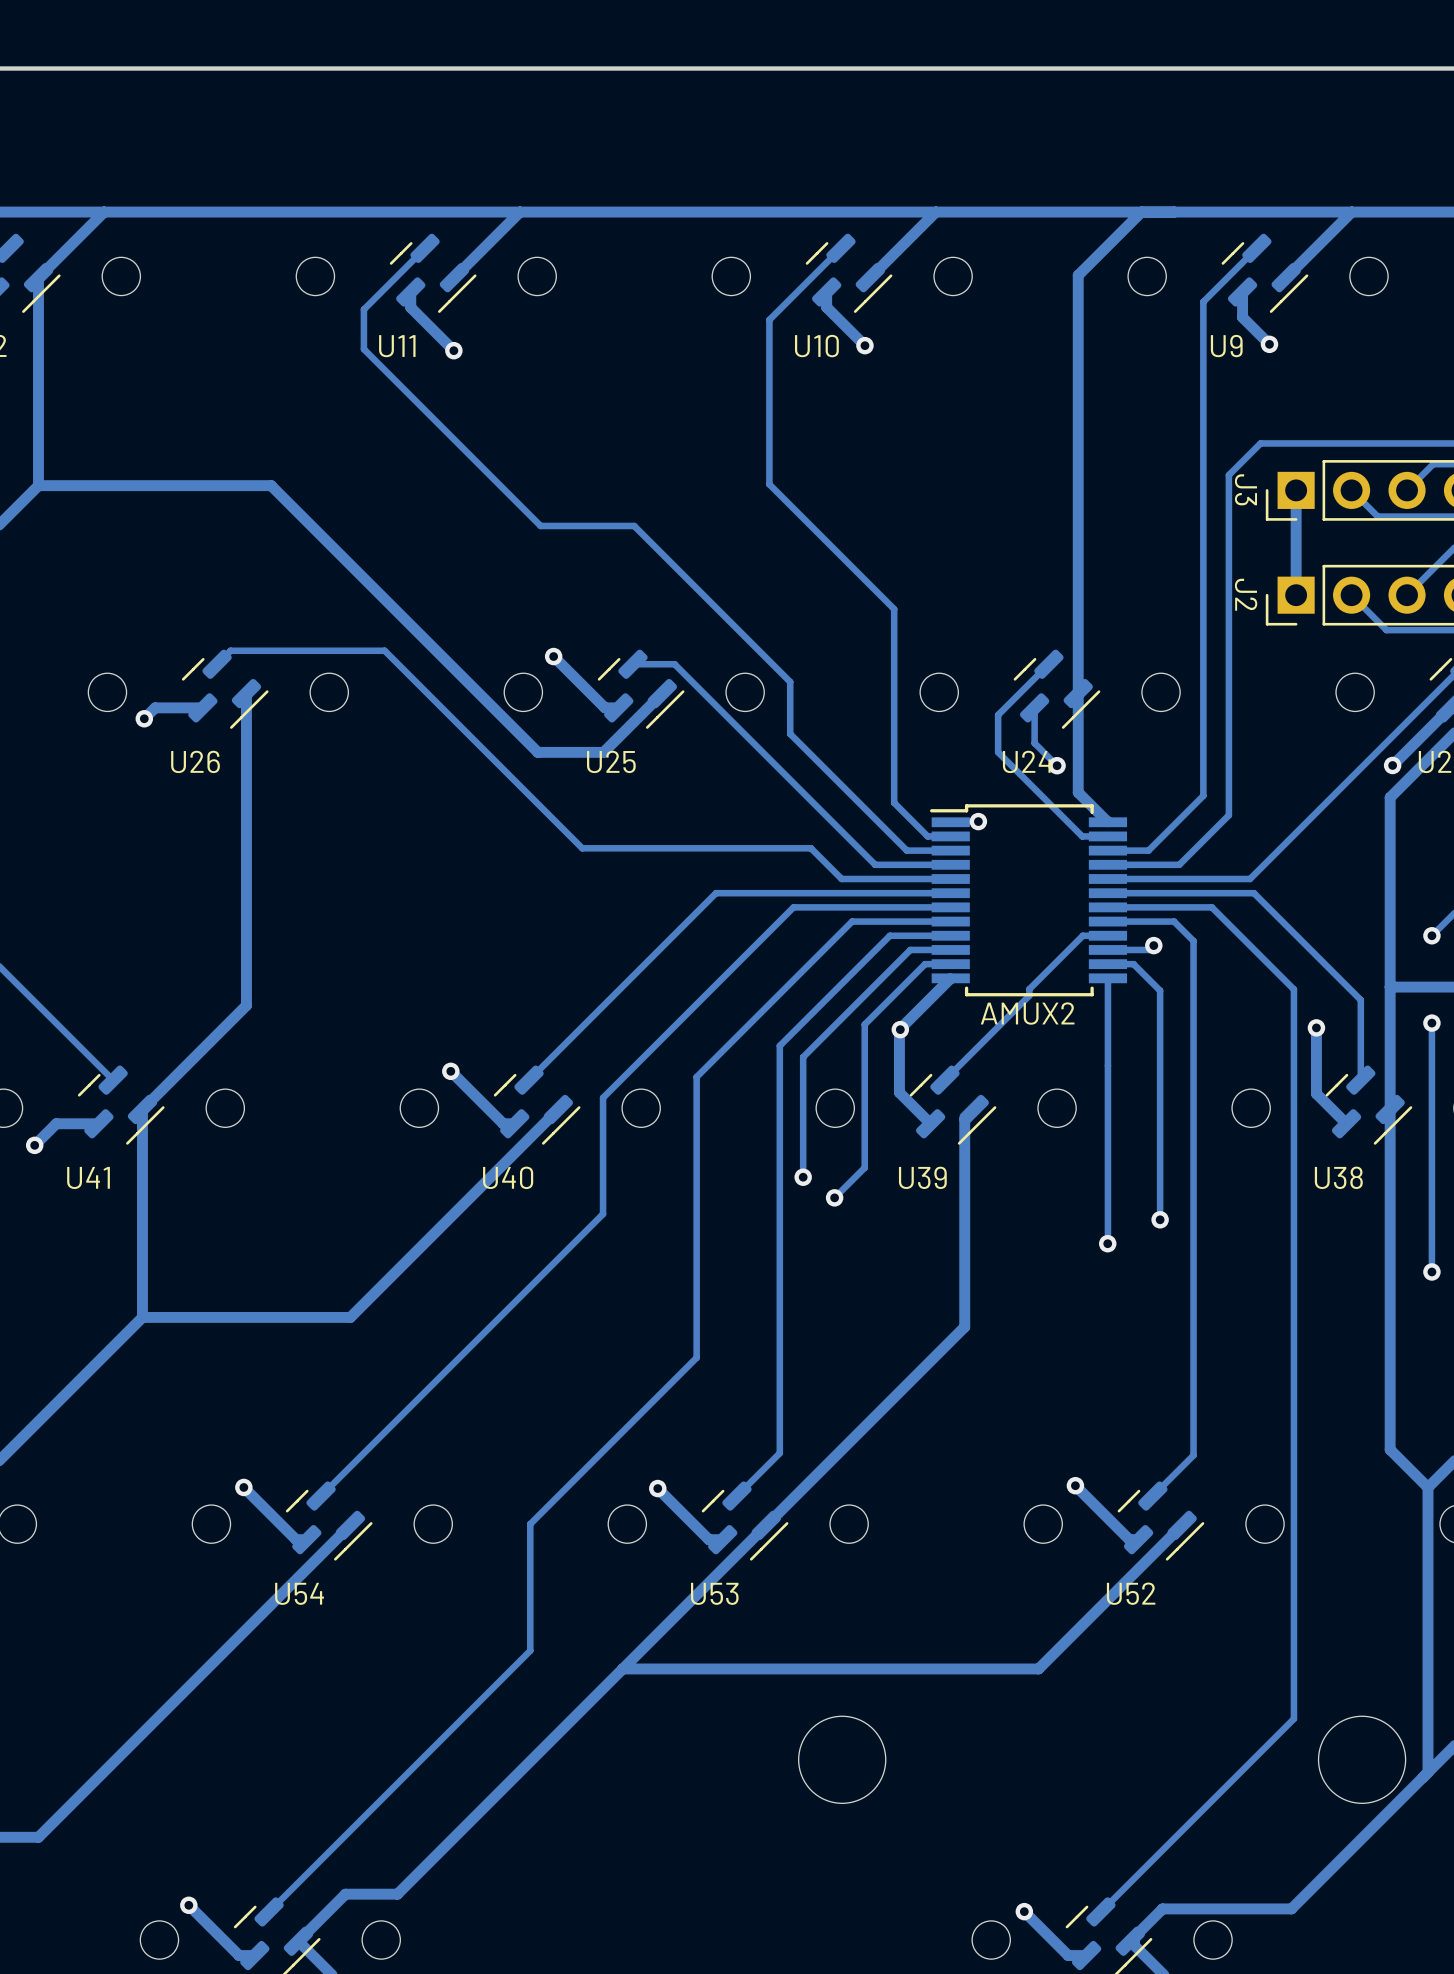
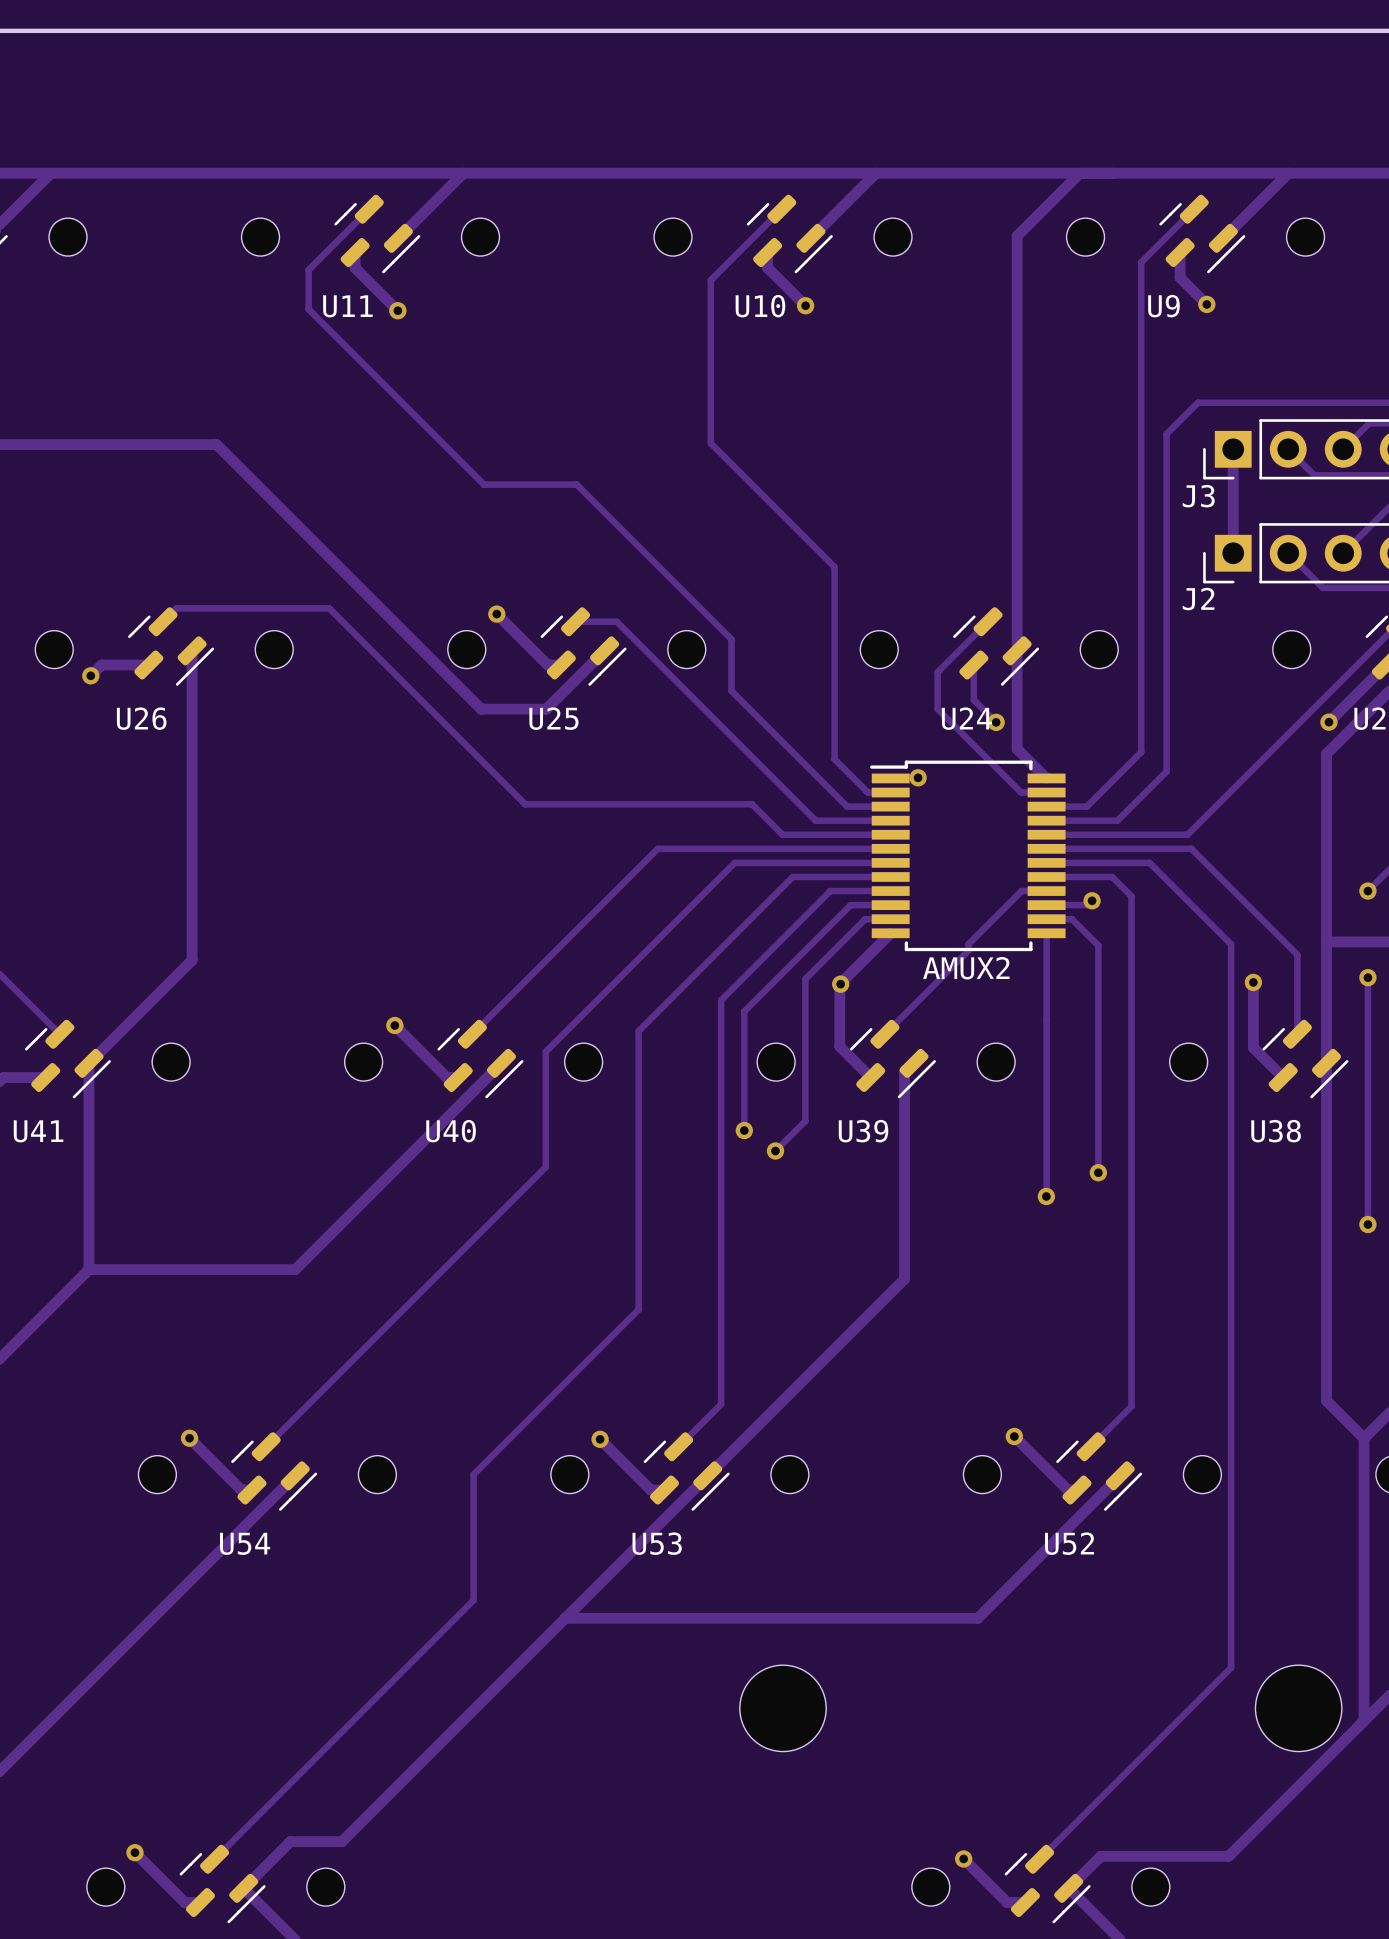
J3 name rotation: 0° (1245, 489) -> 90° counterclockwise (1198, 496)
J3 name position: J3 (1245, 489) -> J3 (1198, 496)
J2 name rotation: 0° (1246, 594) -> 90° counterclockwise (1198, 599)

